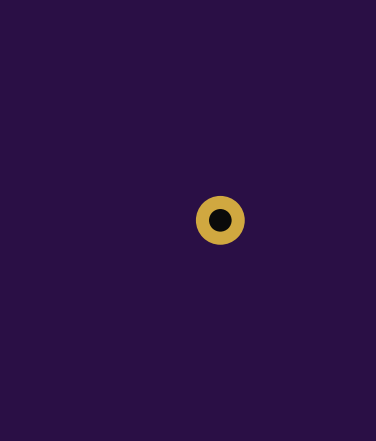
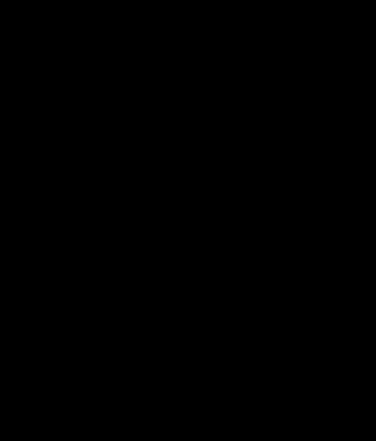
via: (220, 220) -> none

